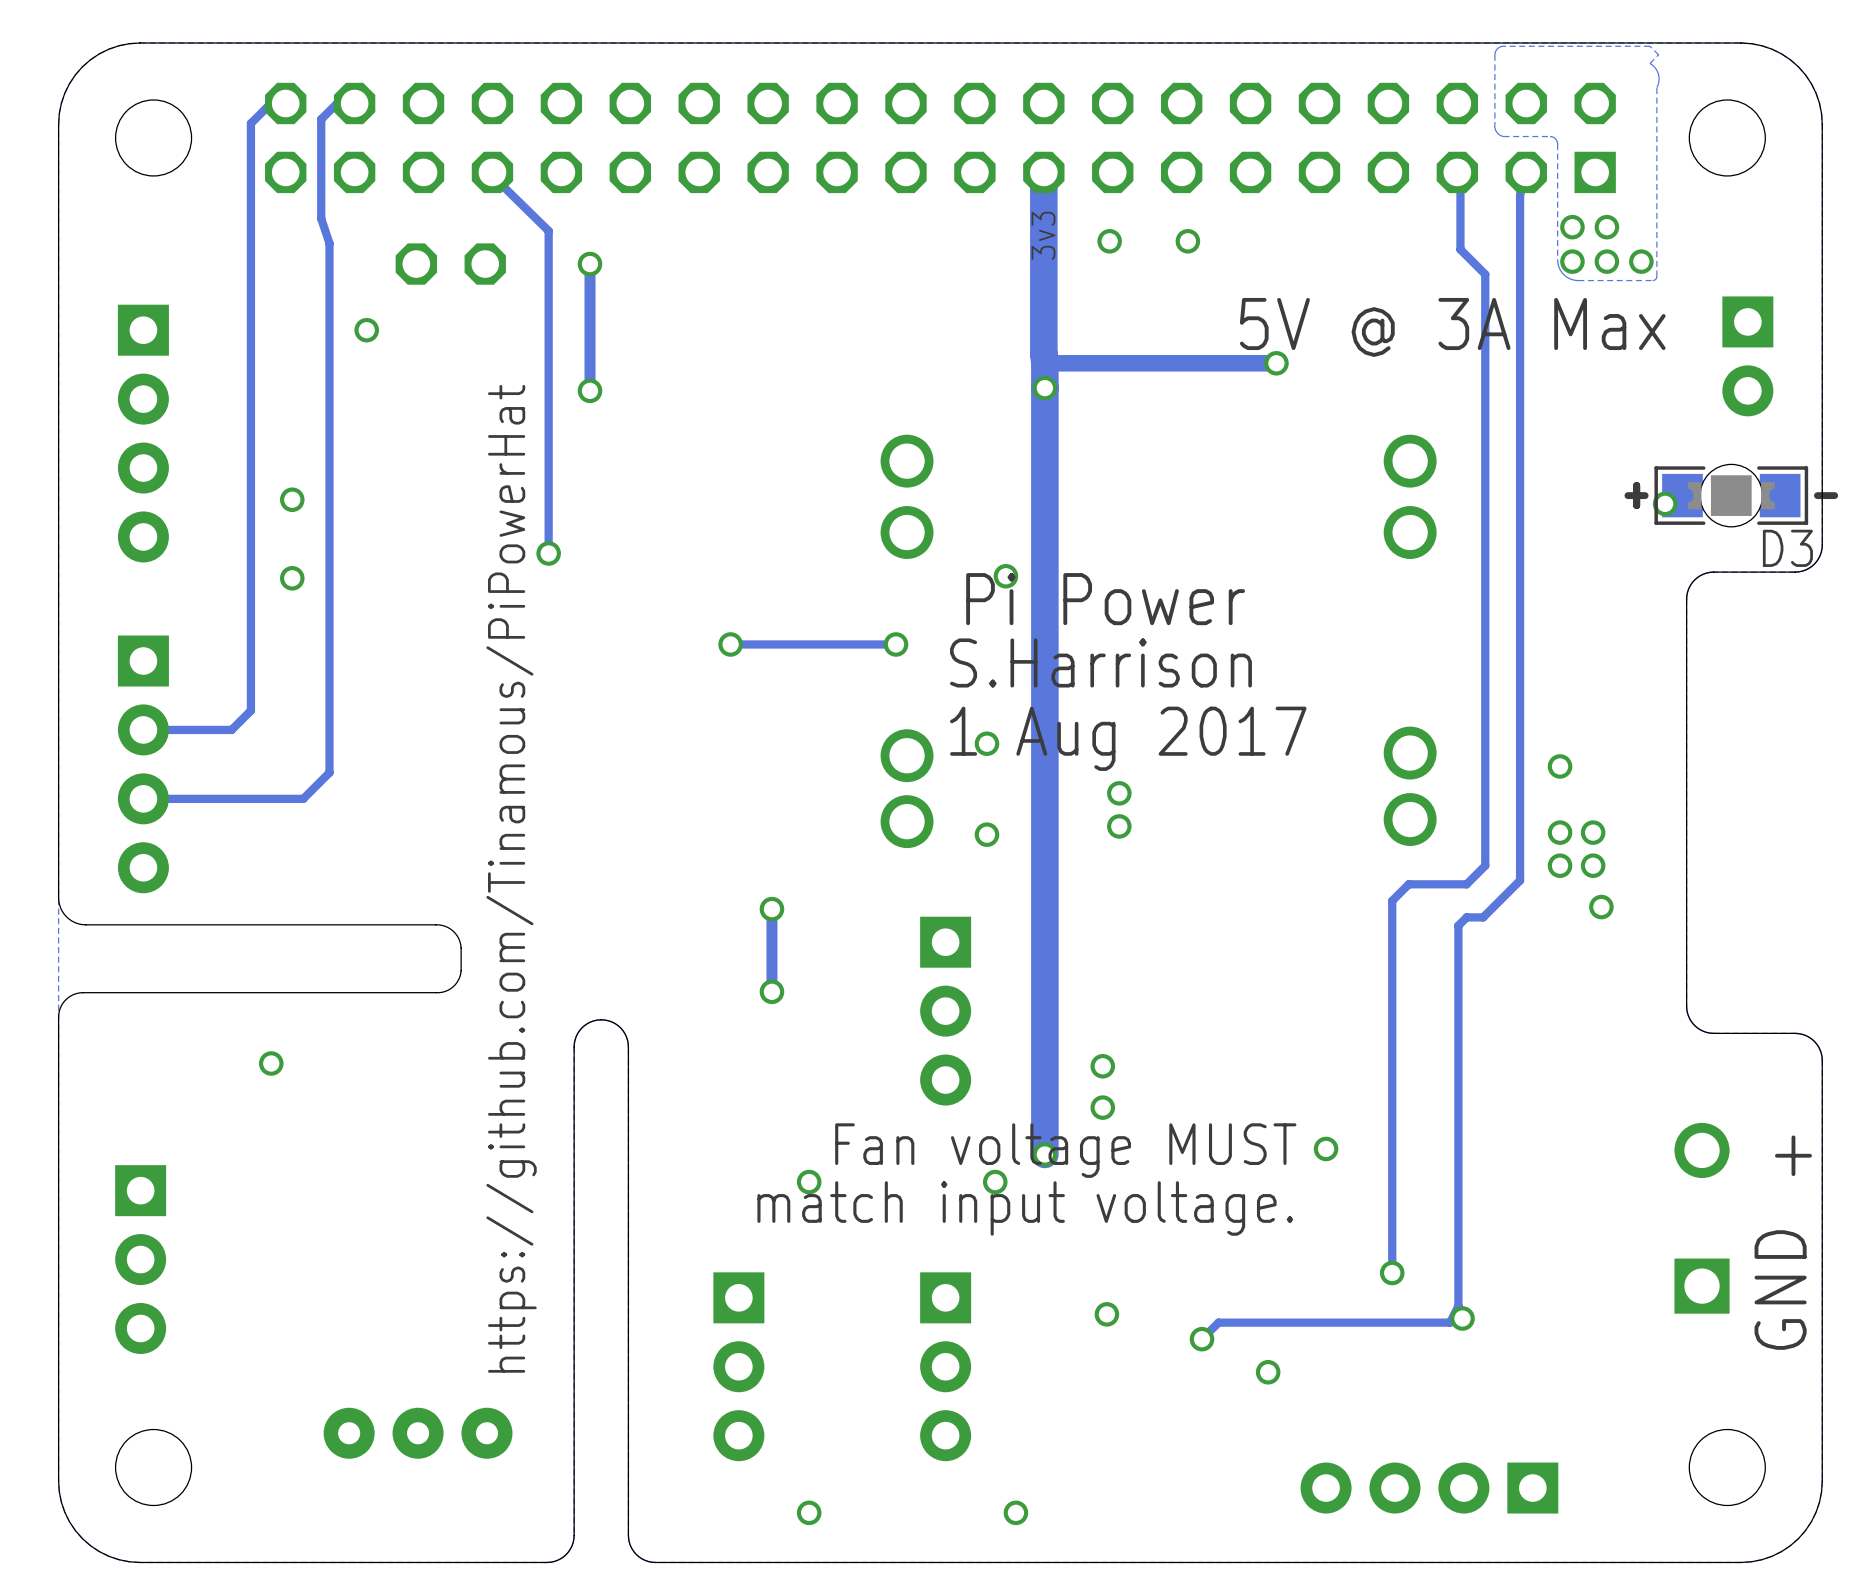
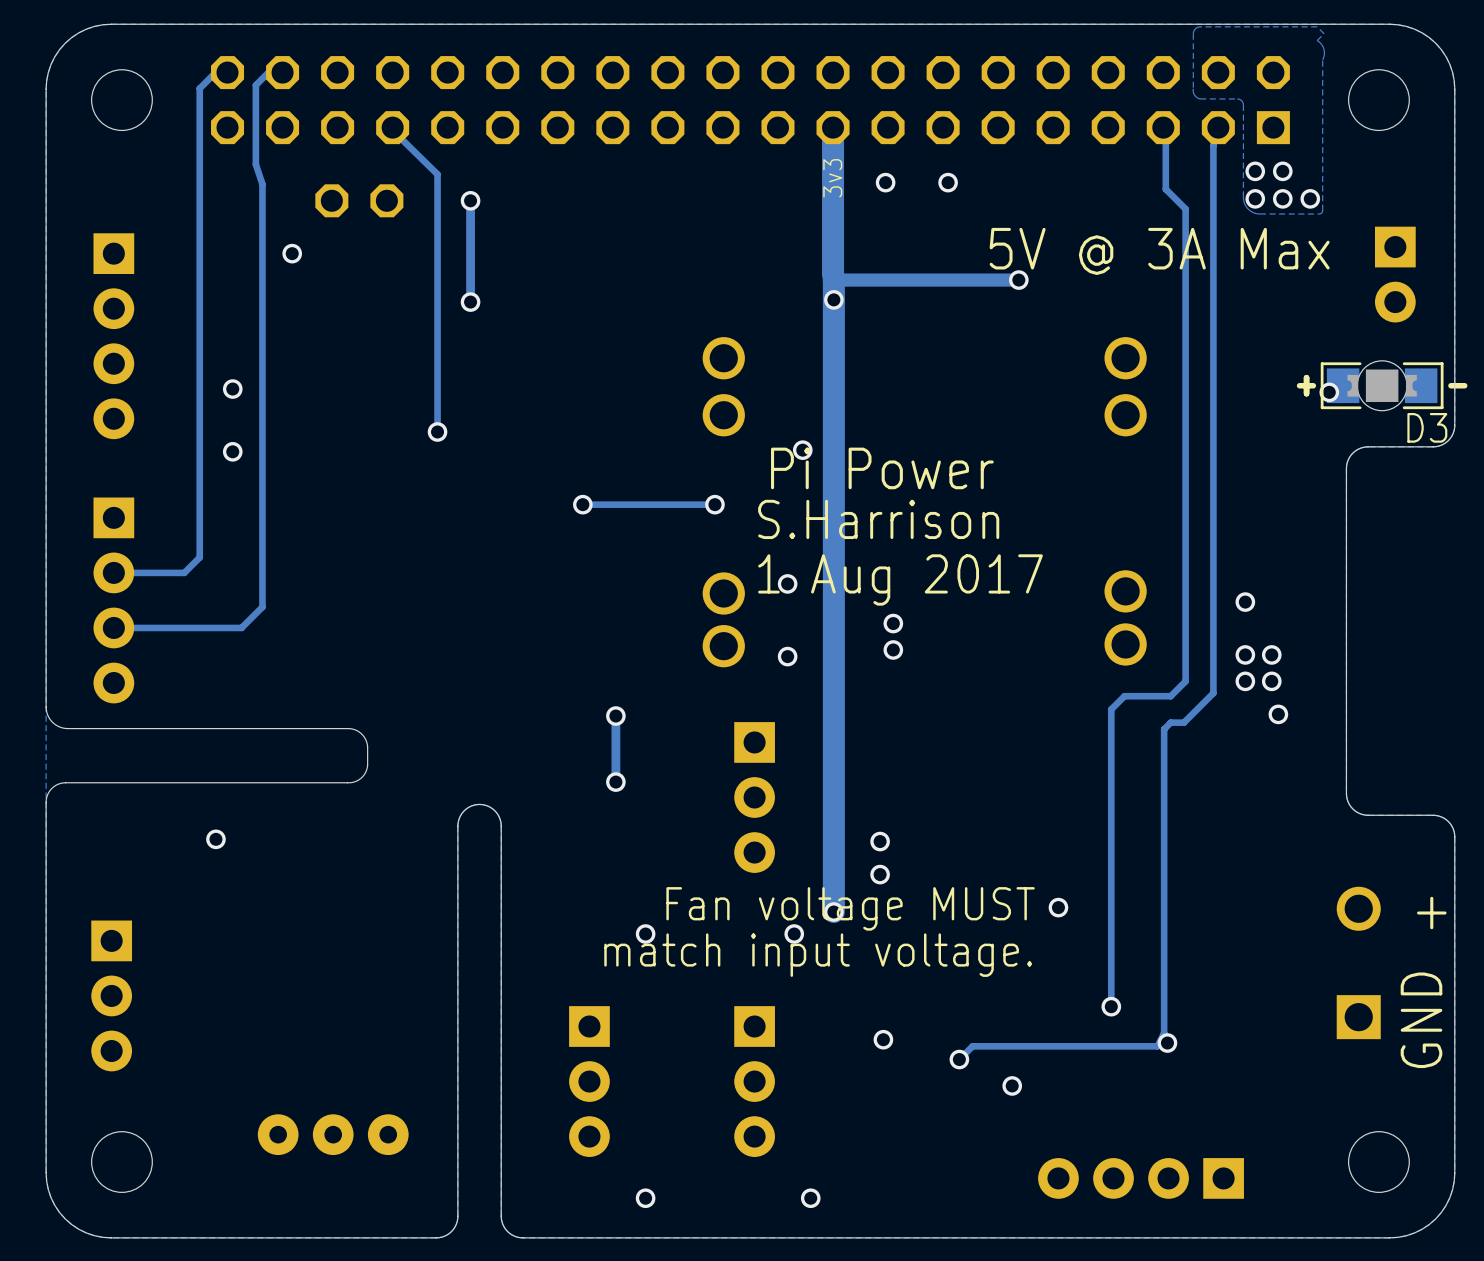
text: https://github.com/Tinamous/PiPowerHat (511, 878) -> none

